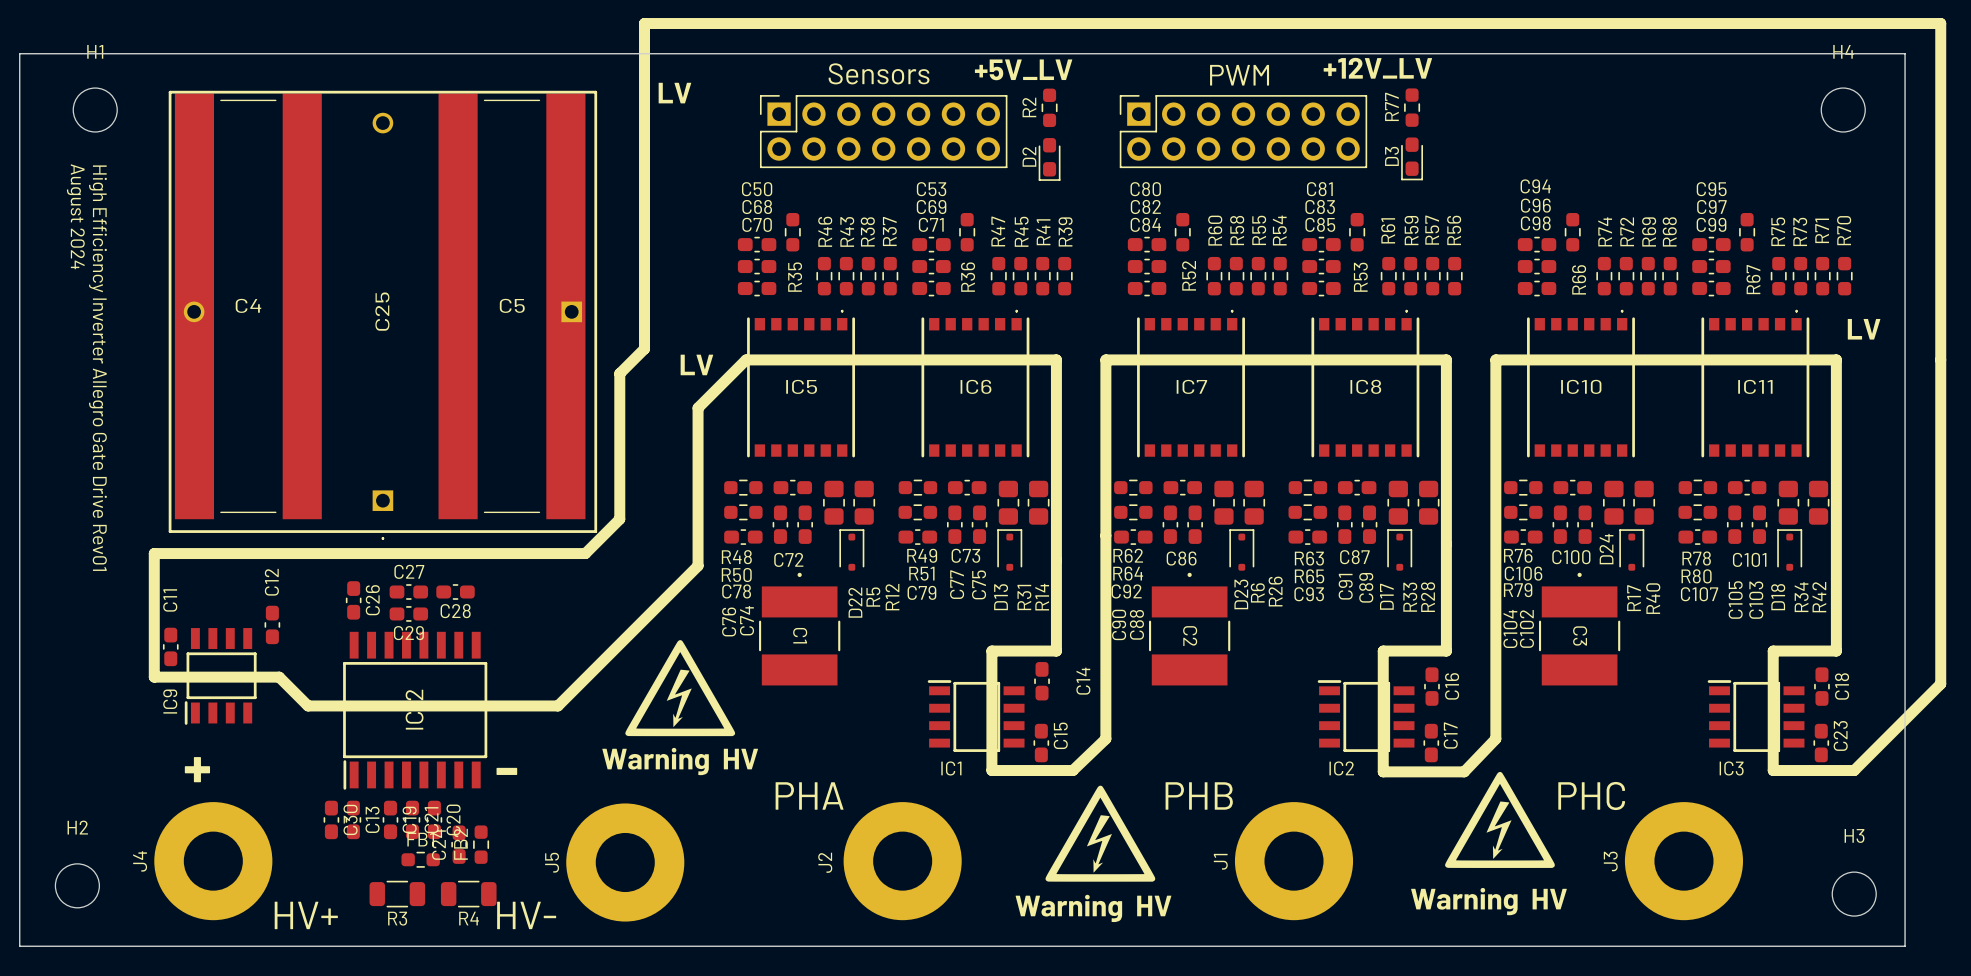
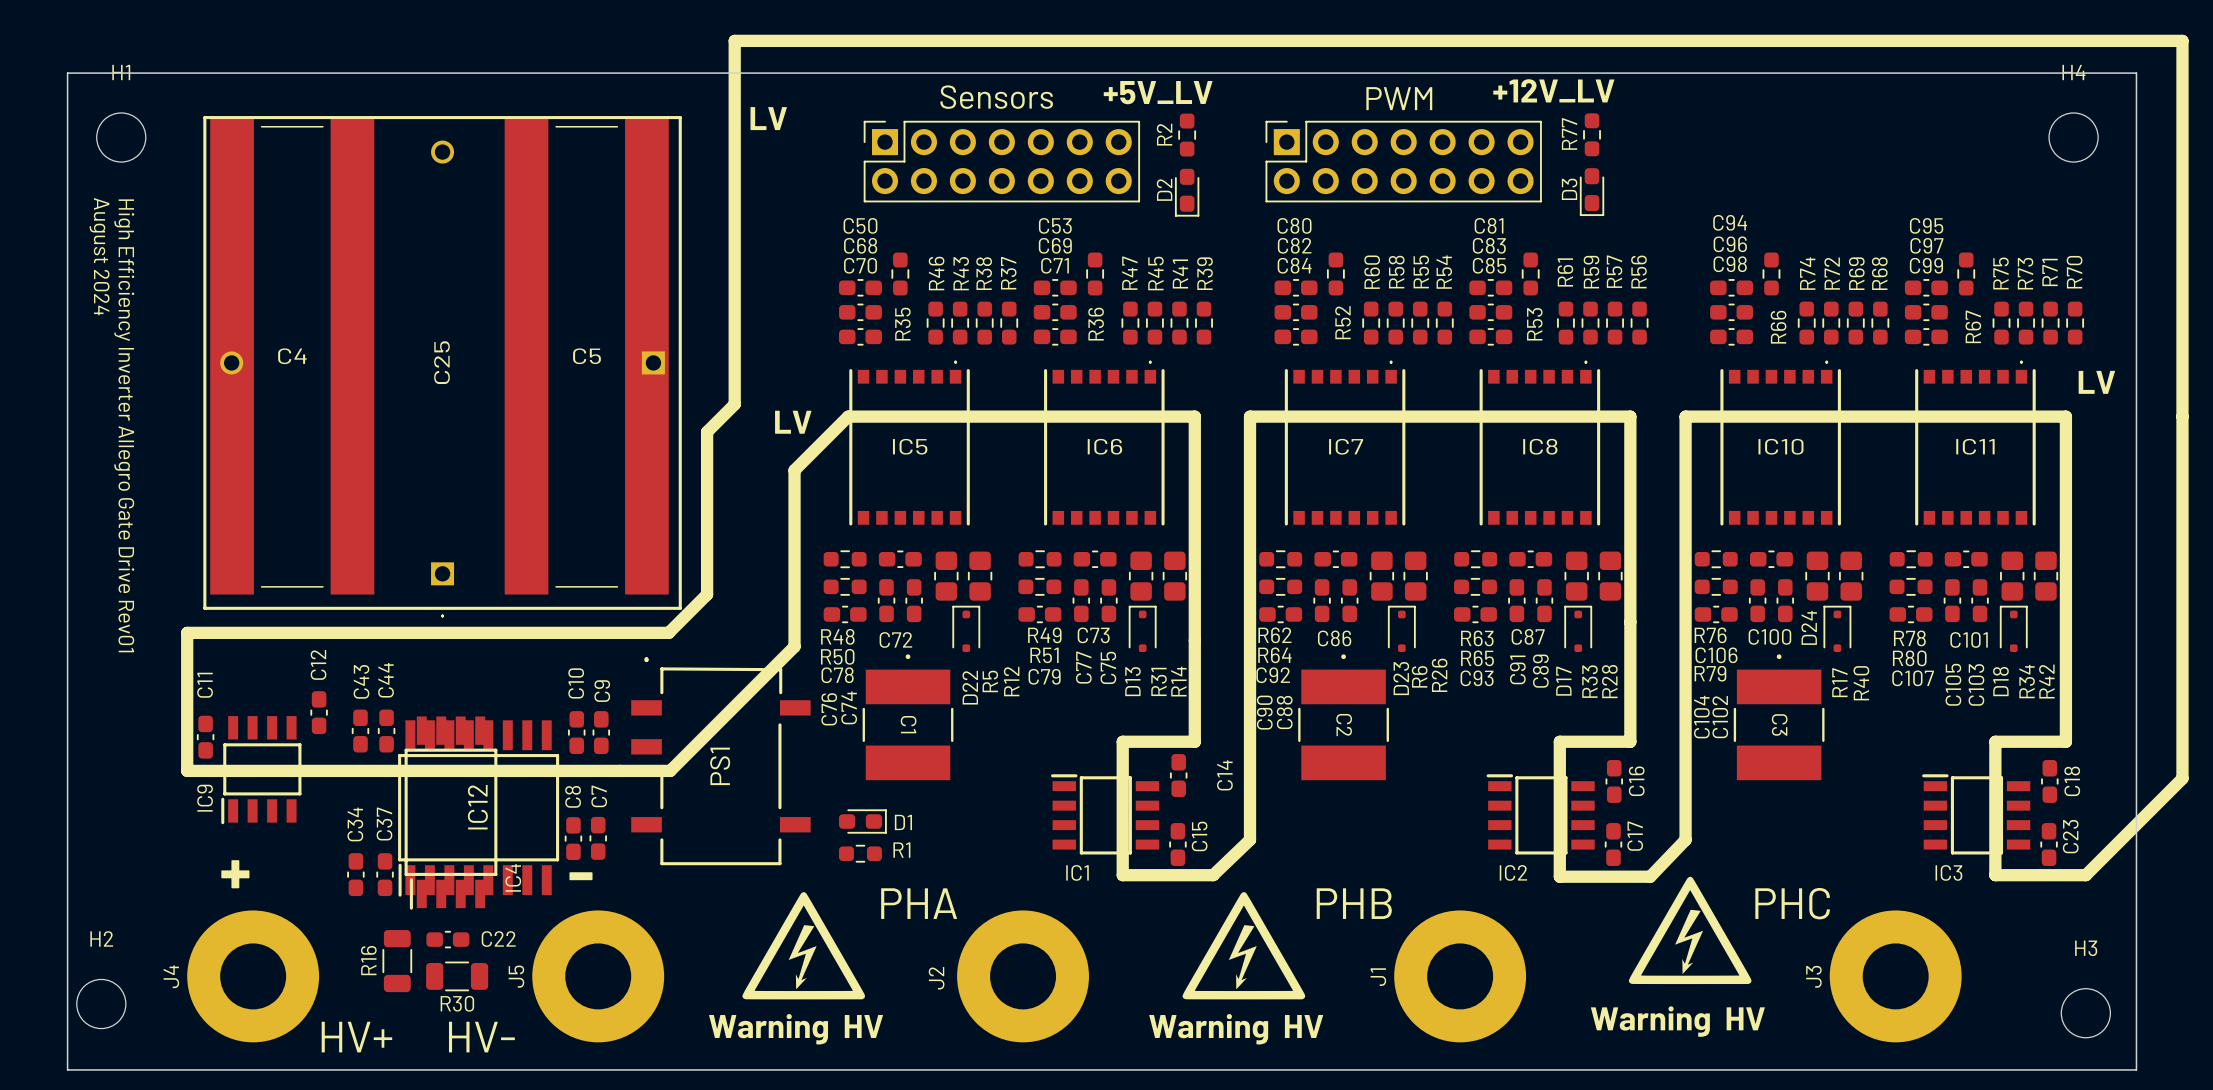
board edge: (19, 53) (1905, 53) (1905, 946) (19, 946) (19, 53) -> (67, 73) (67, 1069) (2136, 1069) (2136, 73) (67, 73)
C27: (408, 591) -> none
C28: (455, 591) -> none
C26: (353, 600) -> none
C29: (408, 613) -> none
C43: none -> (360, 731)
C44: none -> (386, 731)
C10: none -> (576, 732)
C9: none -> (601, 732)
PS1: none -> (720, 761)
line: (279, 677) (308, 705) (557, 705) (586, 677) -> (326, 770) (670, 770)
drawing position: (680, 688) -> (803, 945)
IC4: none -> (450, 813)
D1: none -> (862, 821)
C8: none -> (573, 838)
C7: none -> (598, 838)
R1: none -> (860, 853)
text position: Warning HV (680, 761) -> Warning HV (796, 1029)
C34: none -> (355, 874)
C37: none -> (385, 874)
C30: (331, 819) -> none
C13: (353, 819) -> none
C19: (390, 819) -> none
C21: (412, 819) -> none
C20: (434, 819) -> none
C22: none -> (447, 939)
C24: (459, 844) -> none
FB2: (481, 844) -> none
R16: none -> (397, 961)
FB1: (420, 859) -> none
R30: none -> (457, 976)
J5 position: (625, 862) -> (598, 976)
R3: (397, 894) -> none
R4: (468, 894) -> none
text position: HV- (526, 915) -> HV- (481, 1037)

